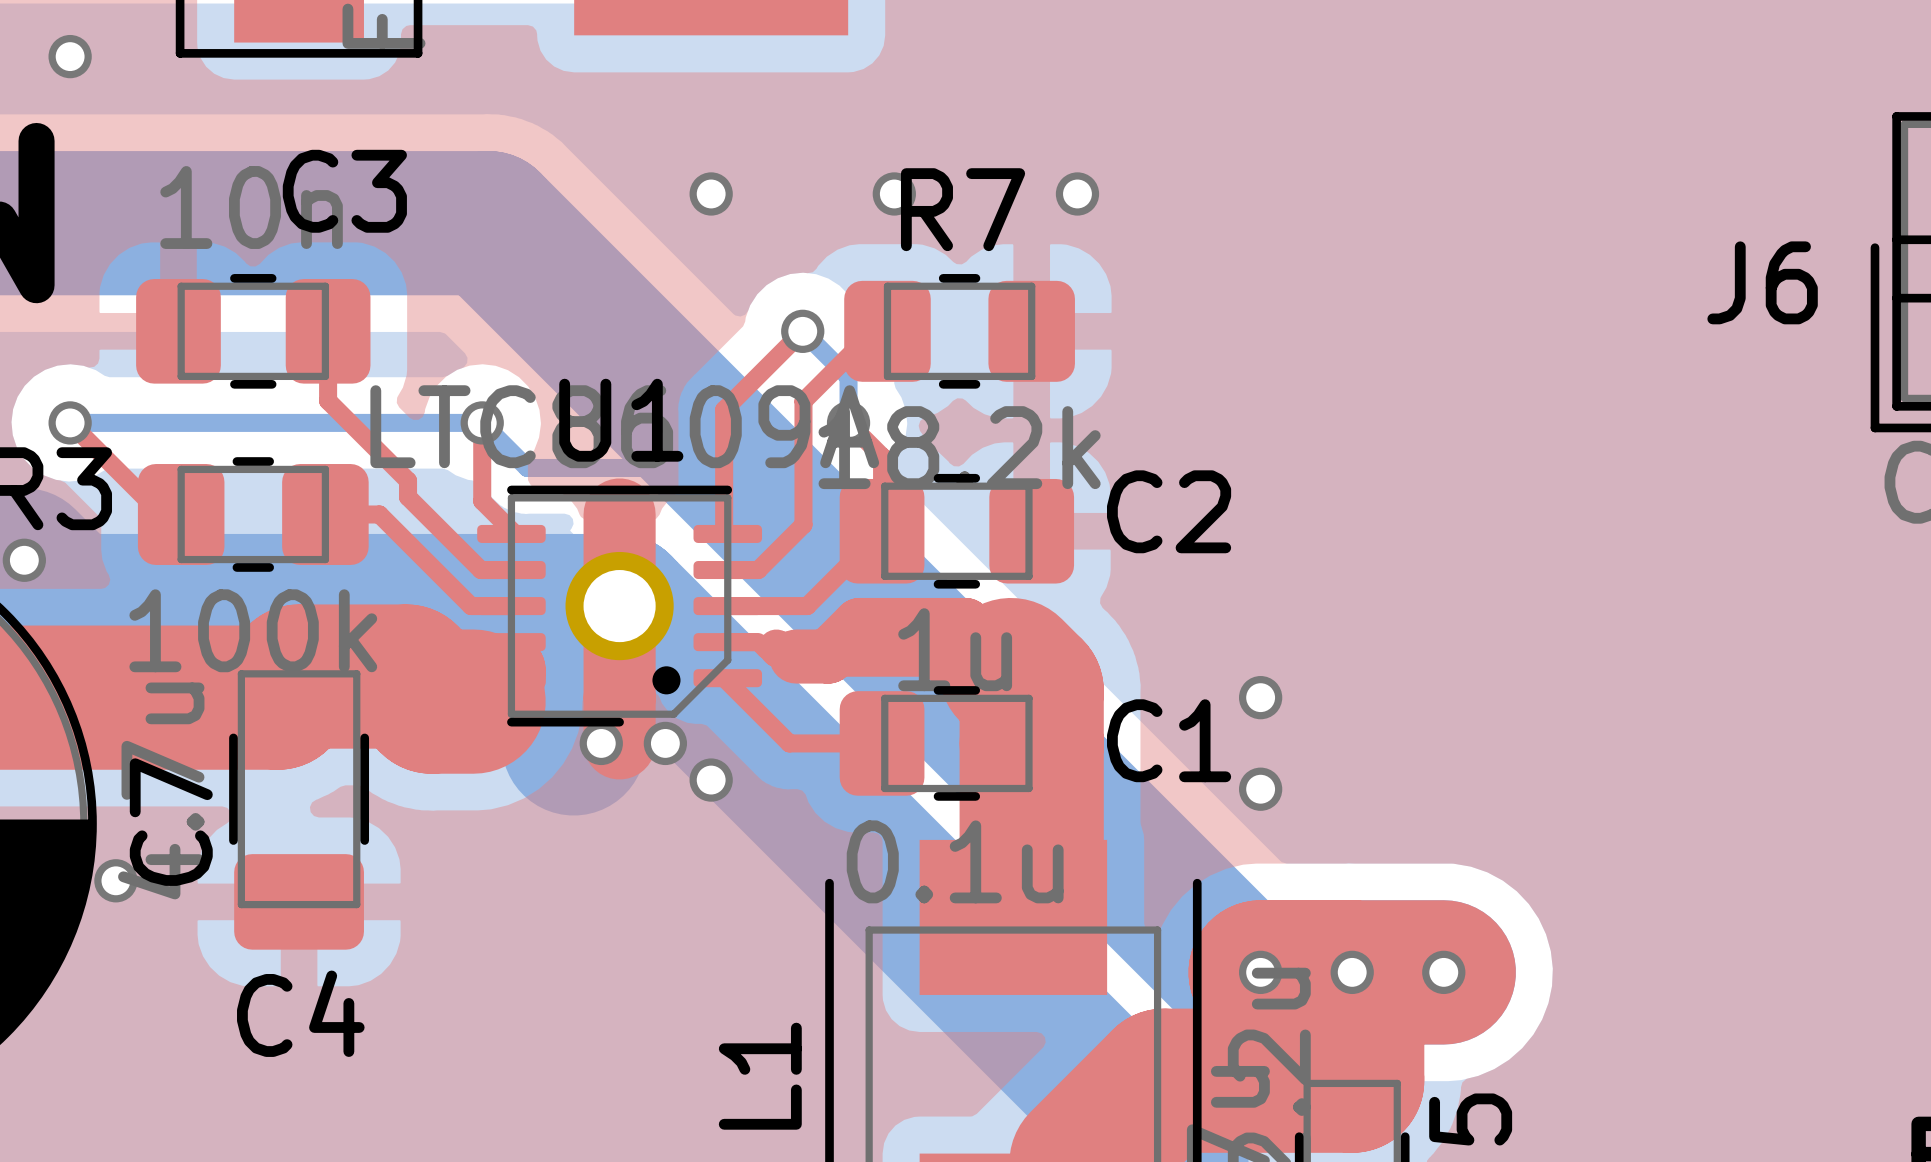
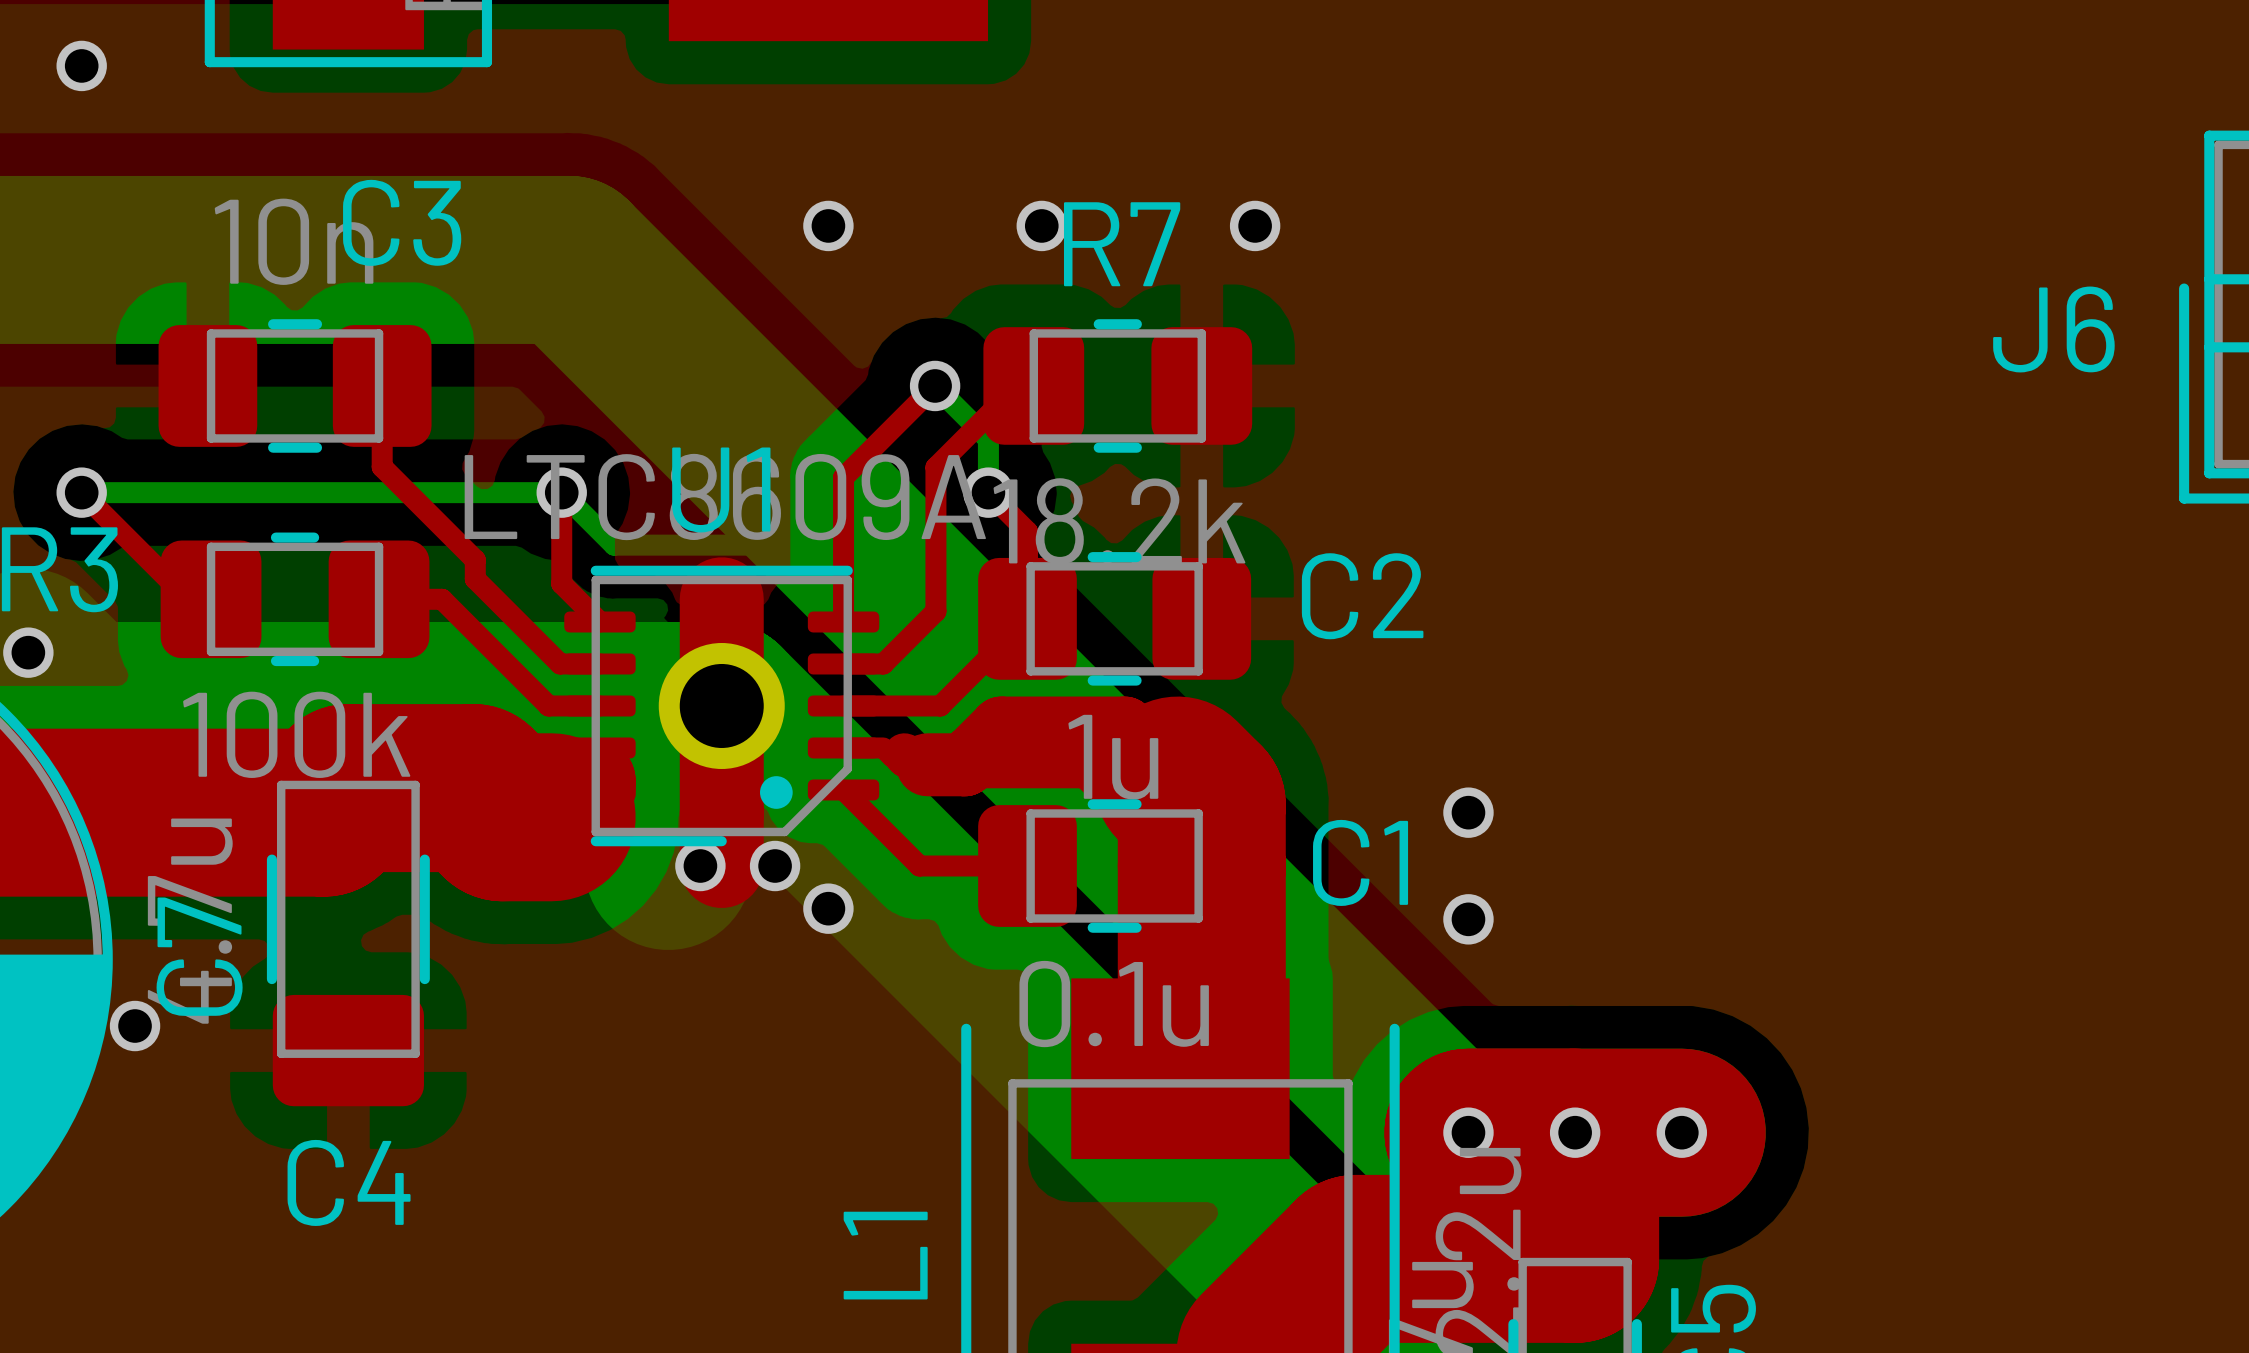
U1 footprint: [477, 485, 763, 727] -> [564, 565, 880, 847]

